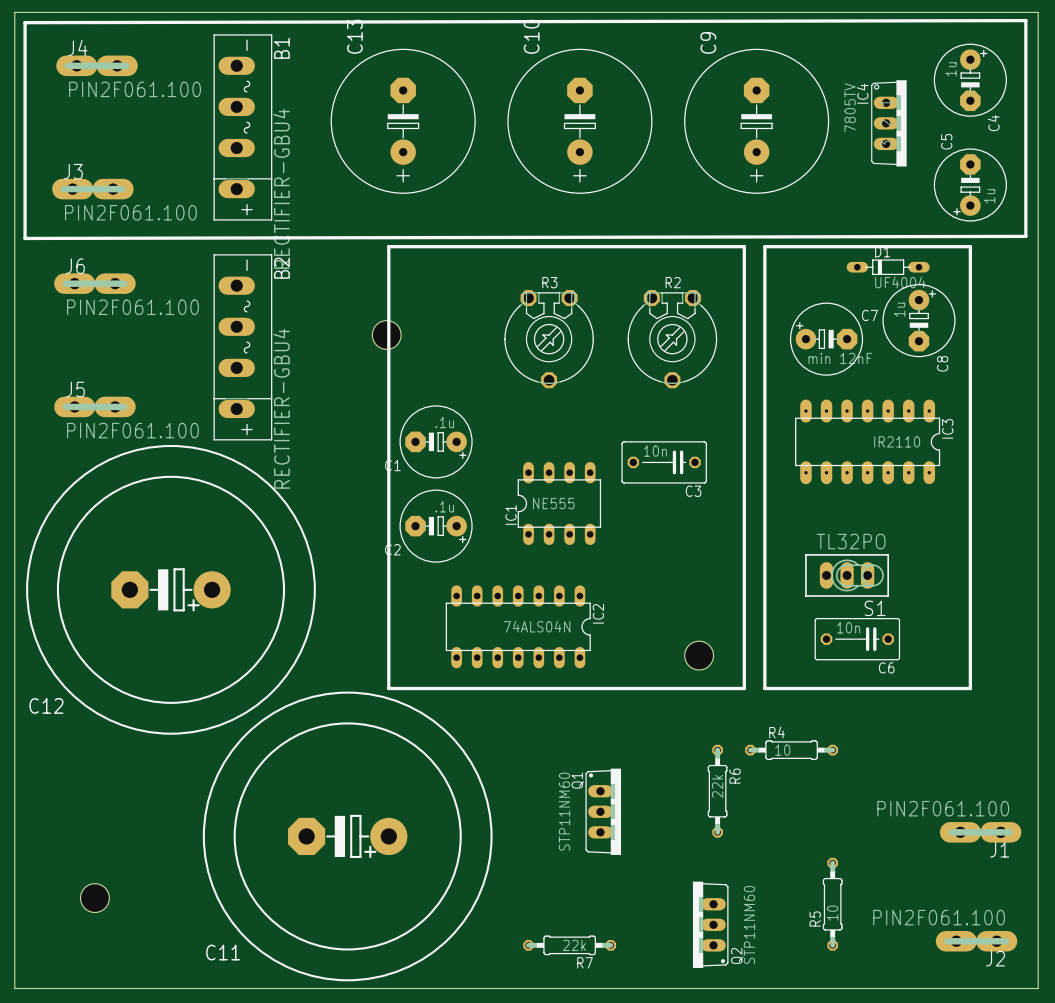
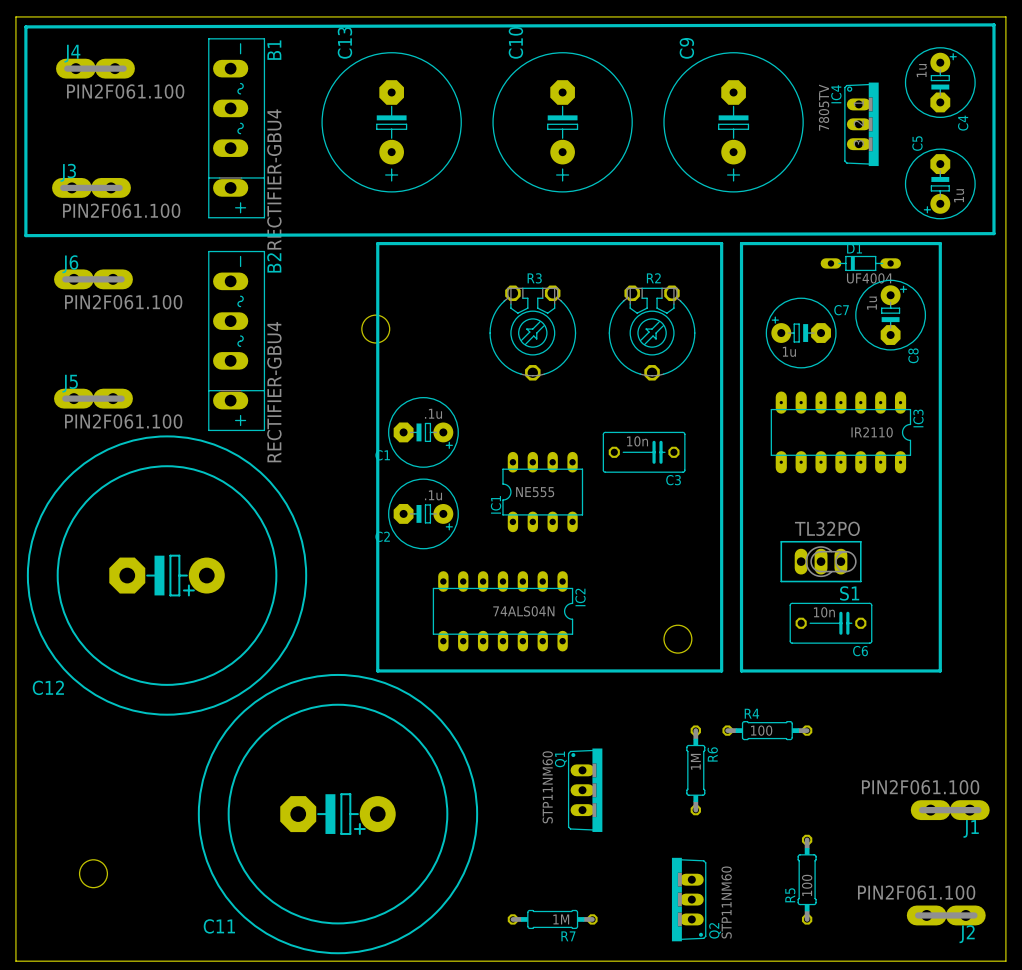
C7 value: min 12nF (840, 358) -> 1u (789, 351)
R4 value: 10 (782, 750) -> 100 (761, 730)
R6 value: 22k (717, 786) -> 1M (695, 761)
R5 value: 10 (832, 913) -> 100 (807, 885)
R7 value: 22k (574, 945) -> 1M (561, 919)

